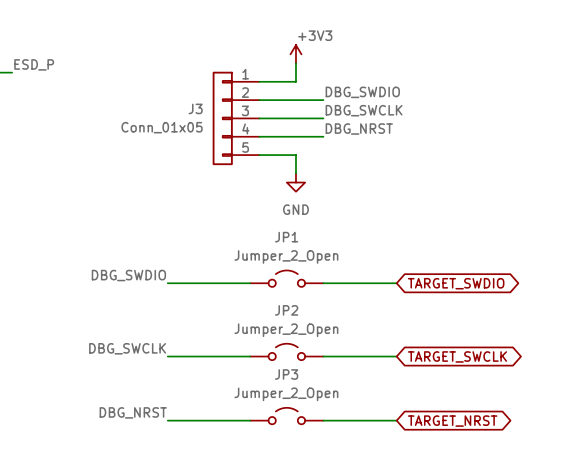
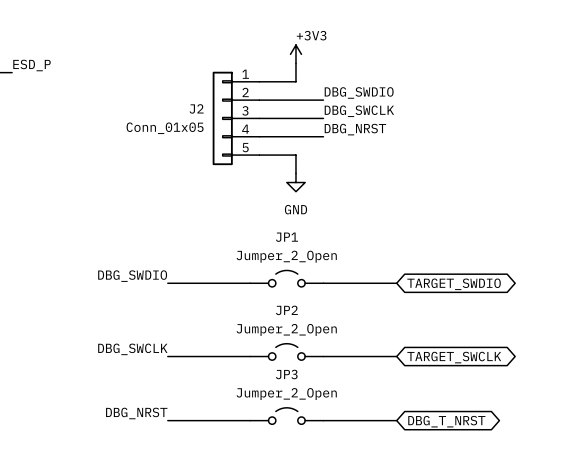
J3 name: J3 (195, 108) -> J2 (196, 108)
global label: TARGET_NRST (452, 421) -> DBG_T_NRST (446, 421)

